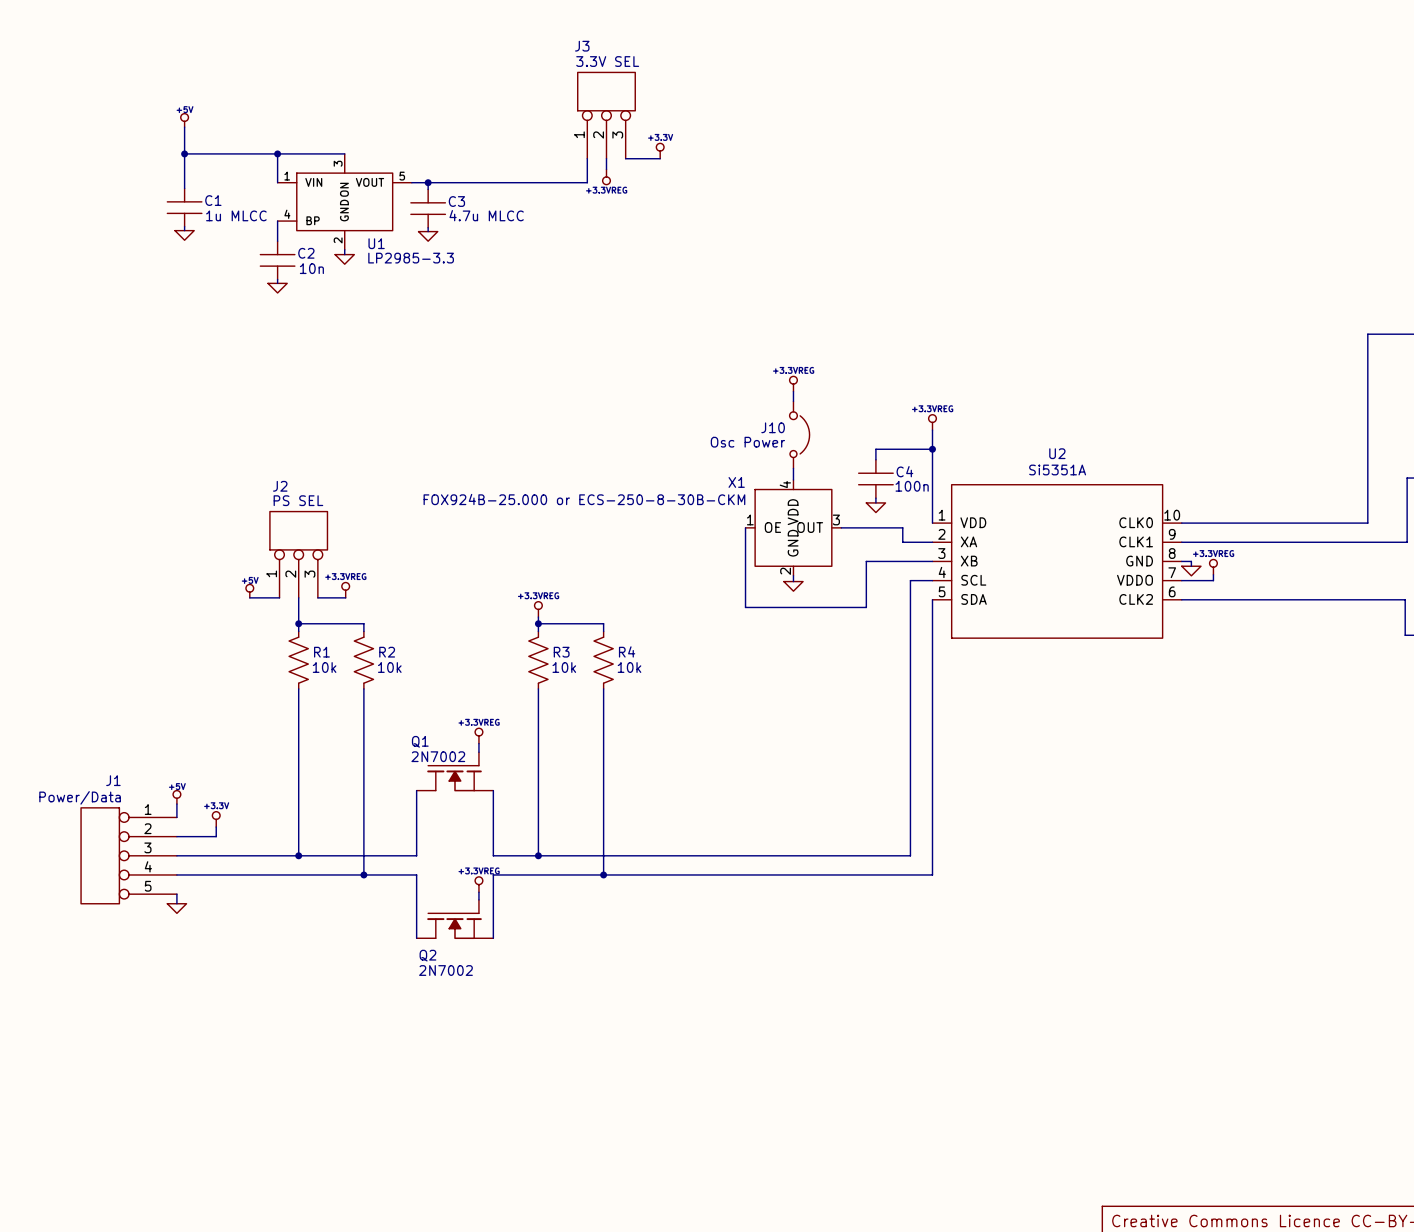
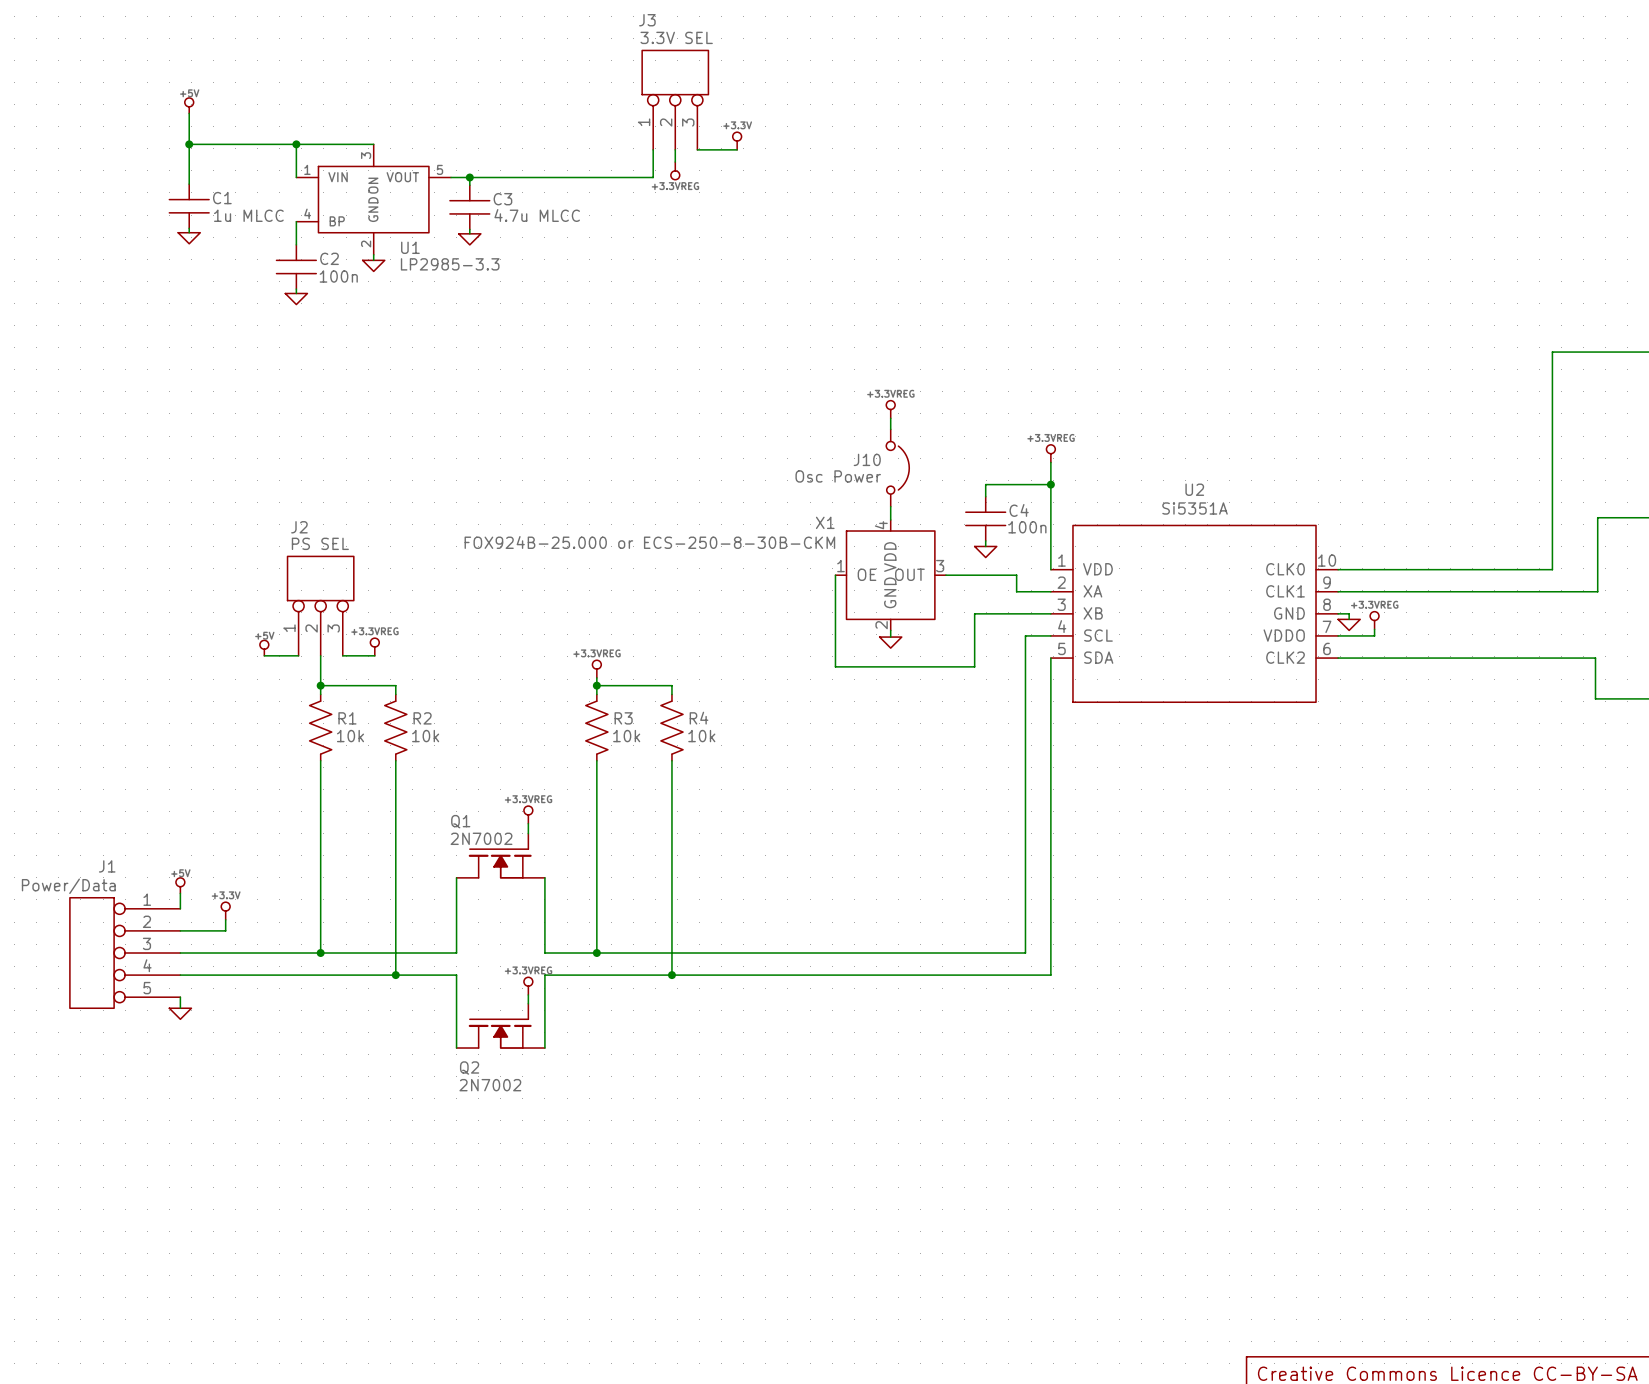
C2 value: 10n (311, 268) -> 100n (338, 276)

